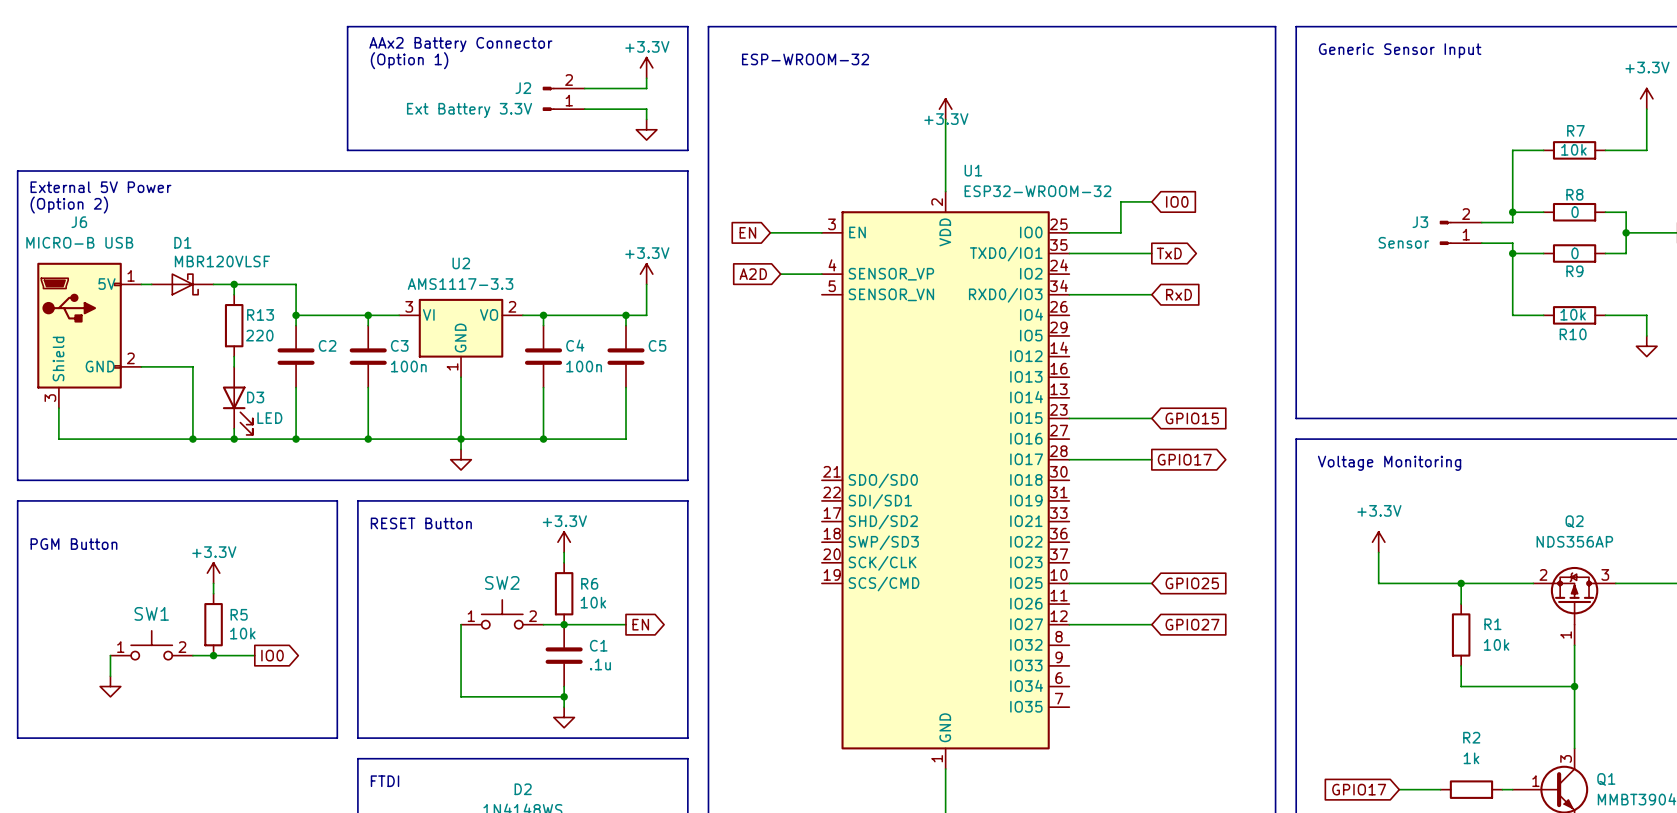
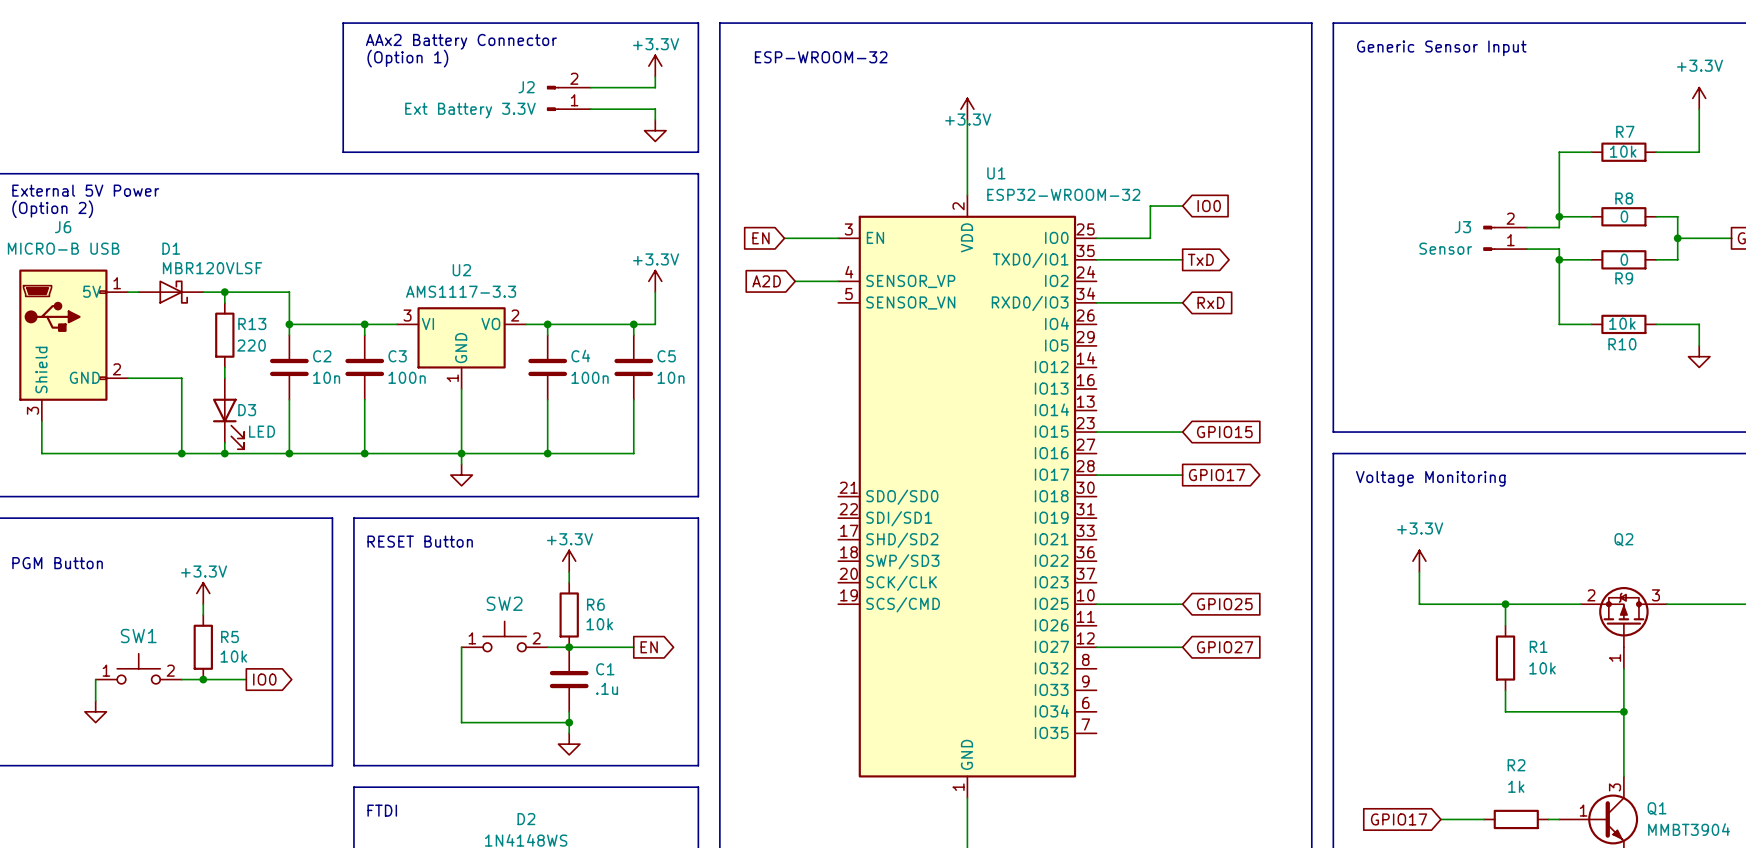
C2 value: none -> 10n (326, 377)
C5 value: none -> 10n (671, 377)
Q2 value: NDS356AP (1574, 541) -> none

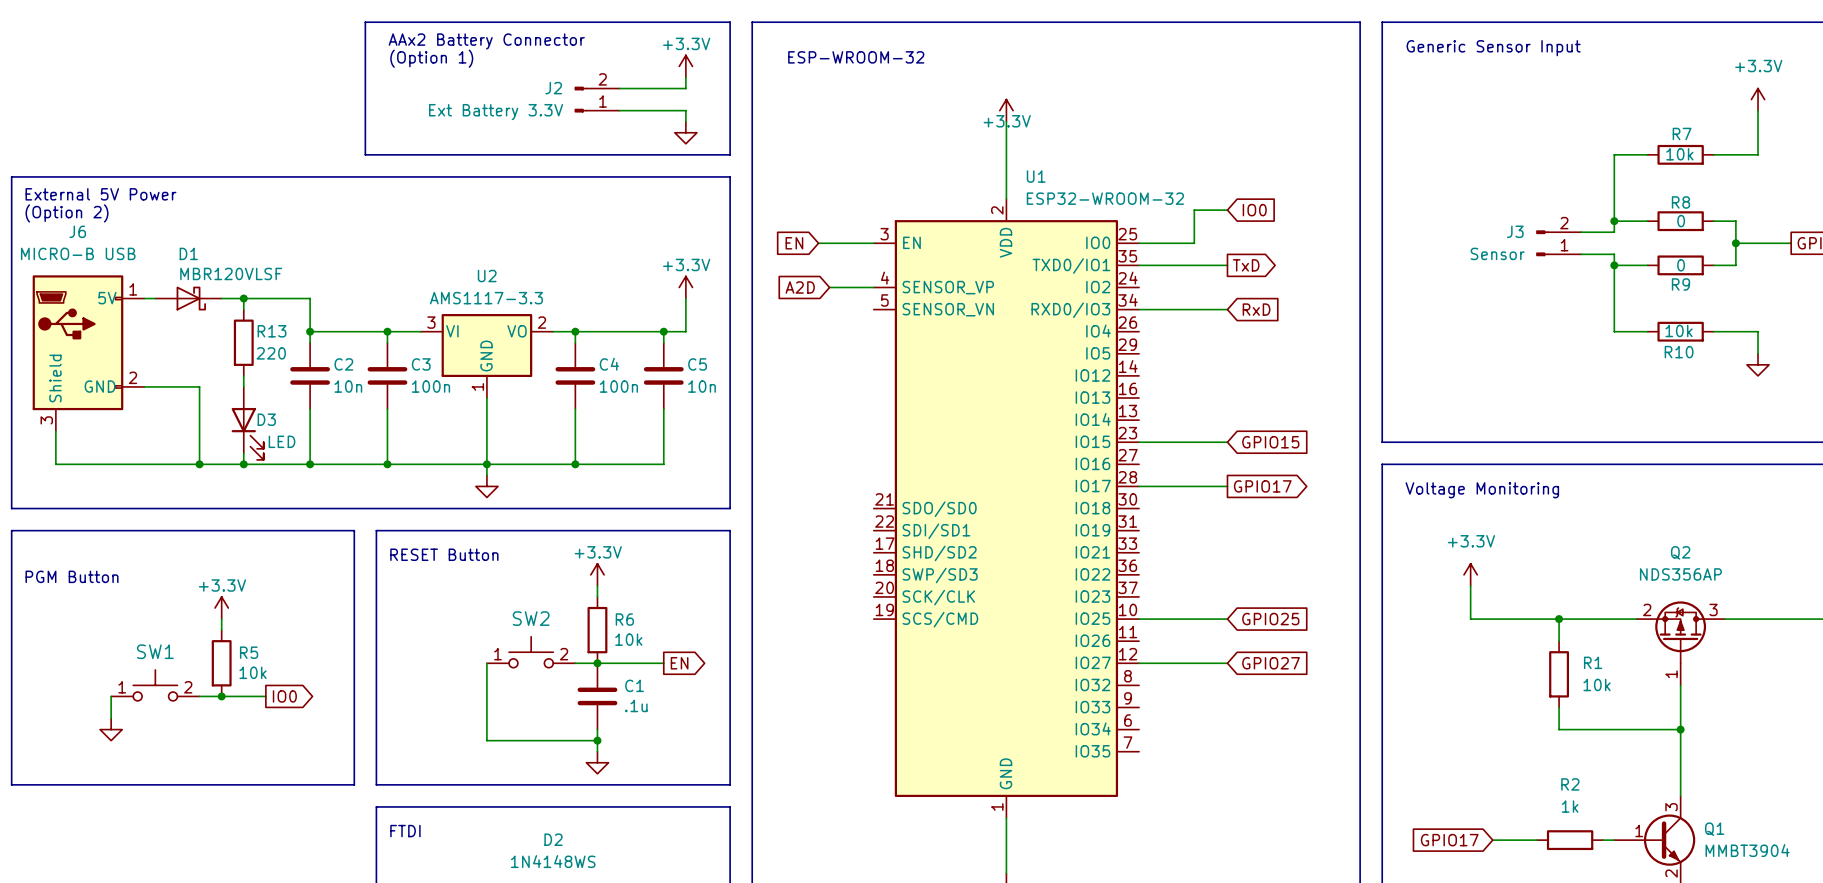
Q2 value: none -> NDS356AP (1680, 574)

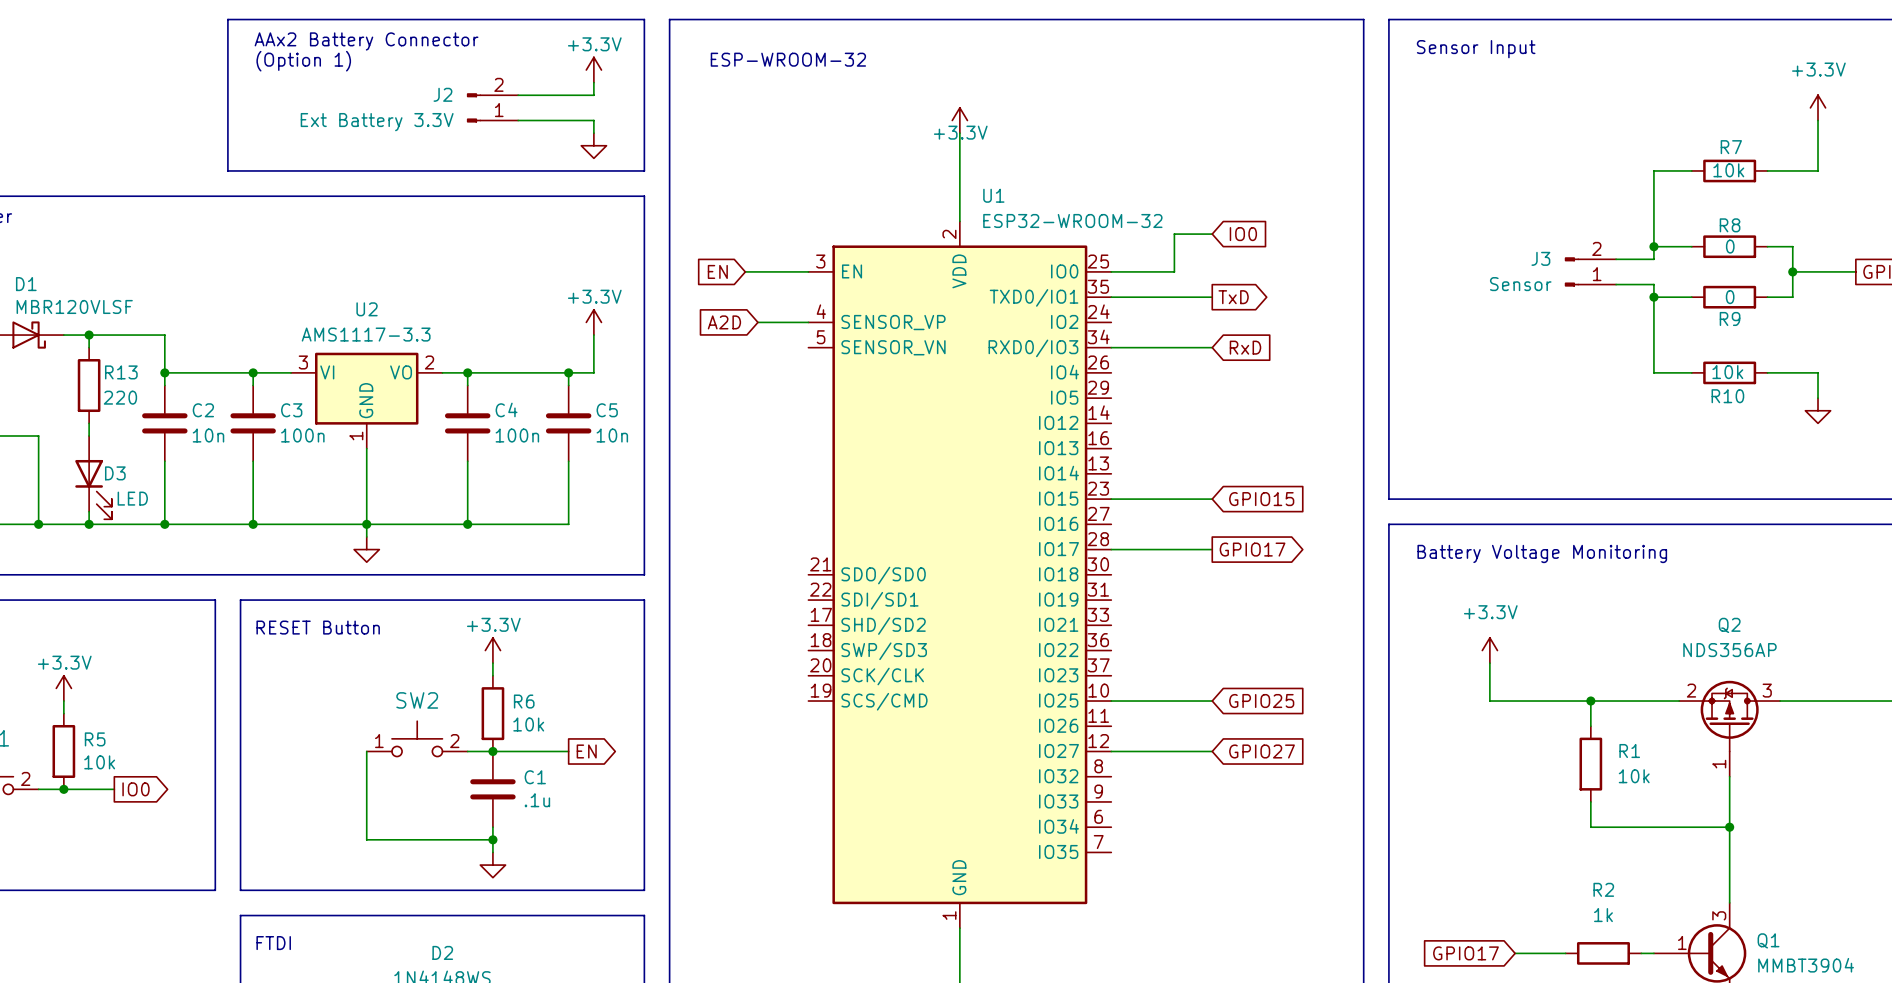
text: Generic Sensor Input (1493, 48) -> Sensor Input (1476, 49)
text: Voltage Monitoring (1482, 490) -> Battery Voltage Monitoring (1542, 553)

